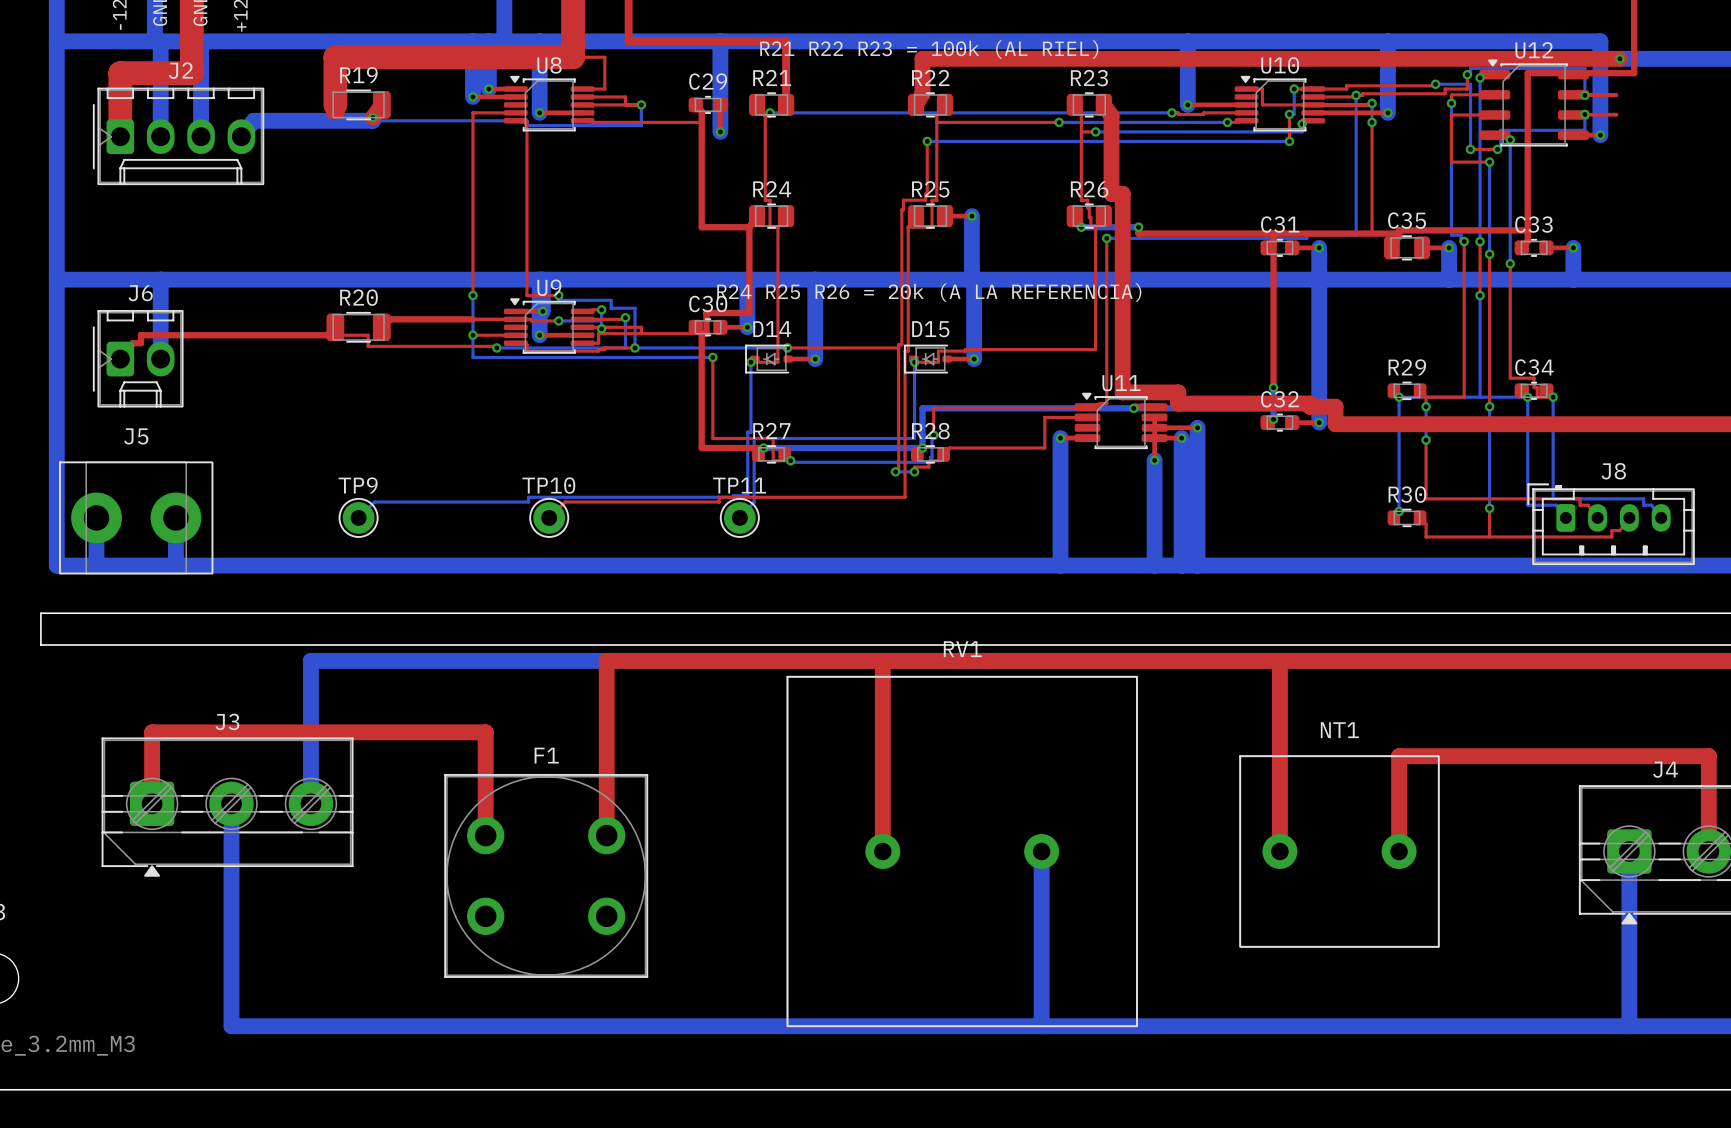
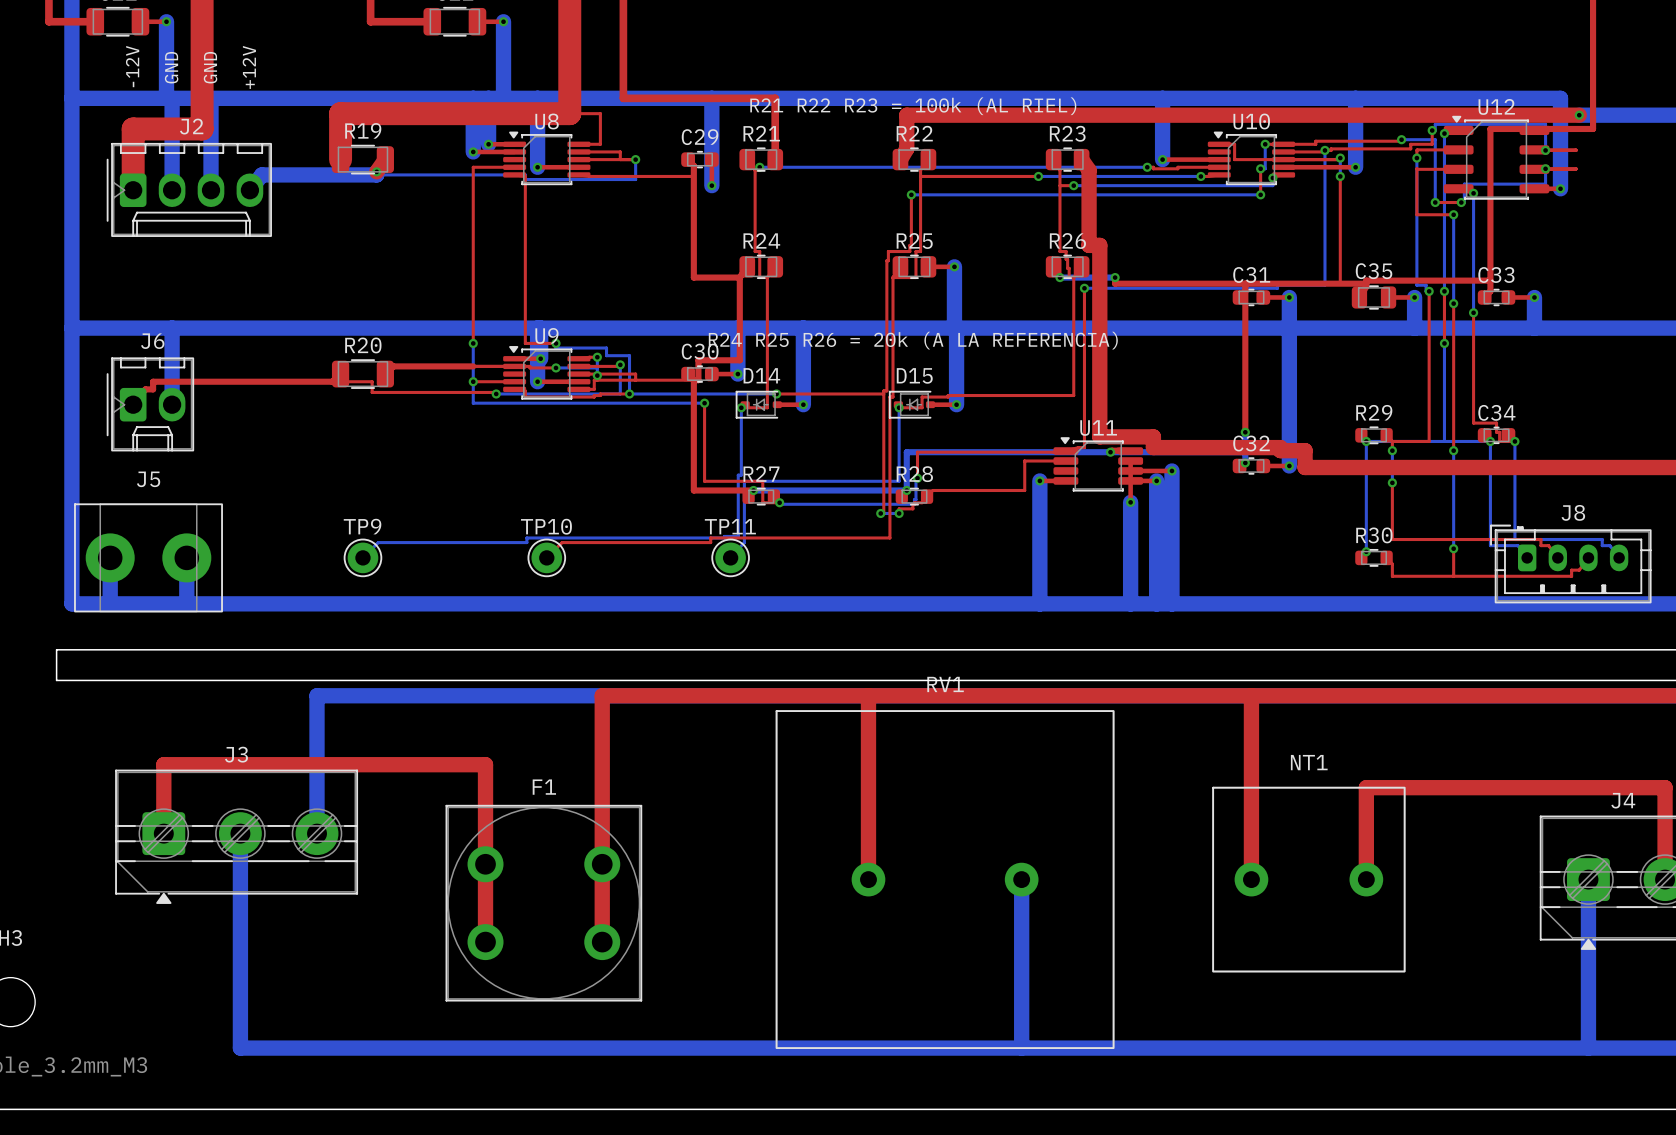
top track: none -> (485, 864) (485, 942)
top track: none -> (602, 864) (602, 942)

